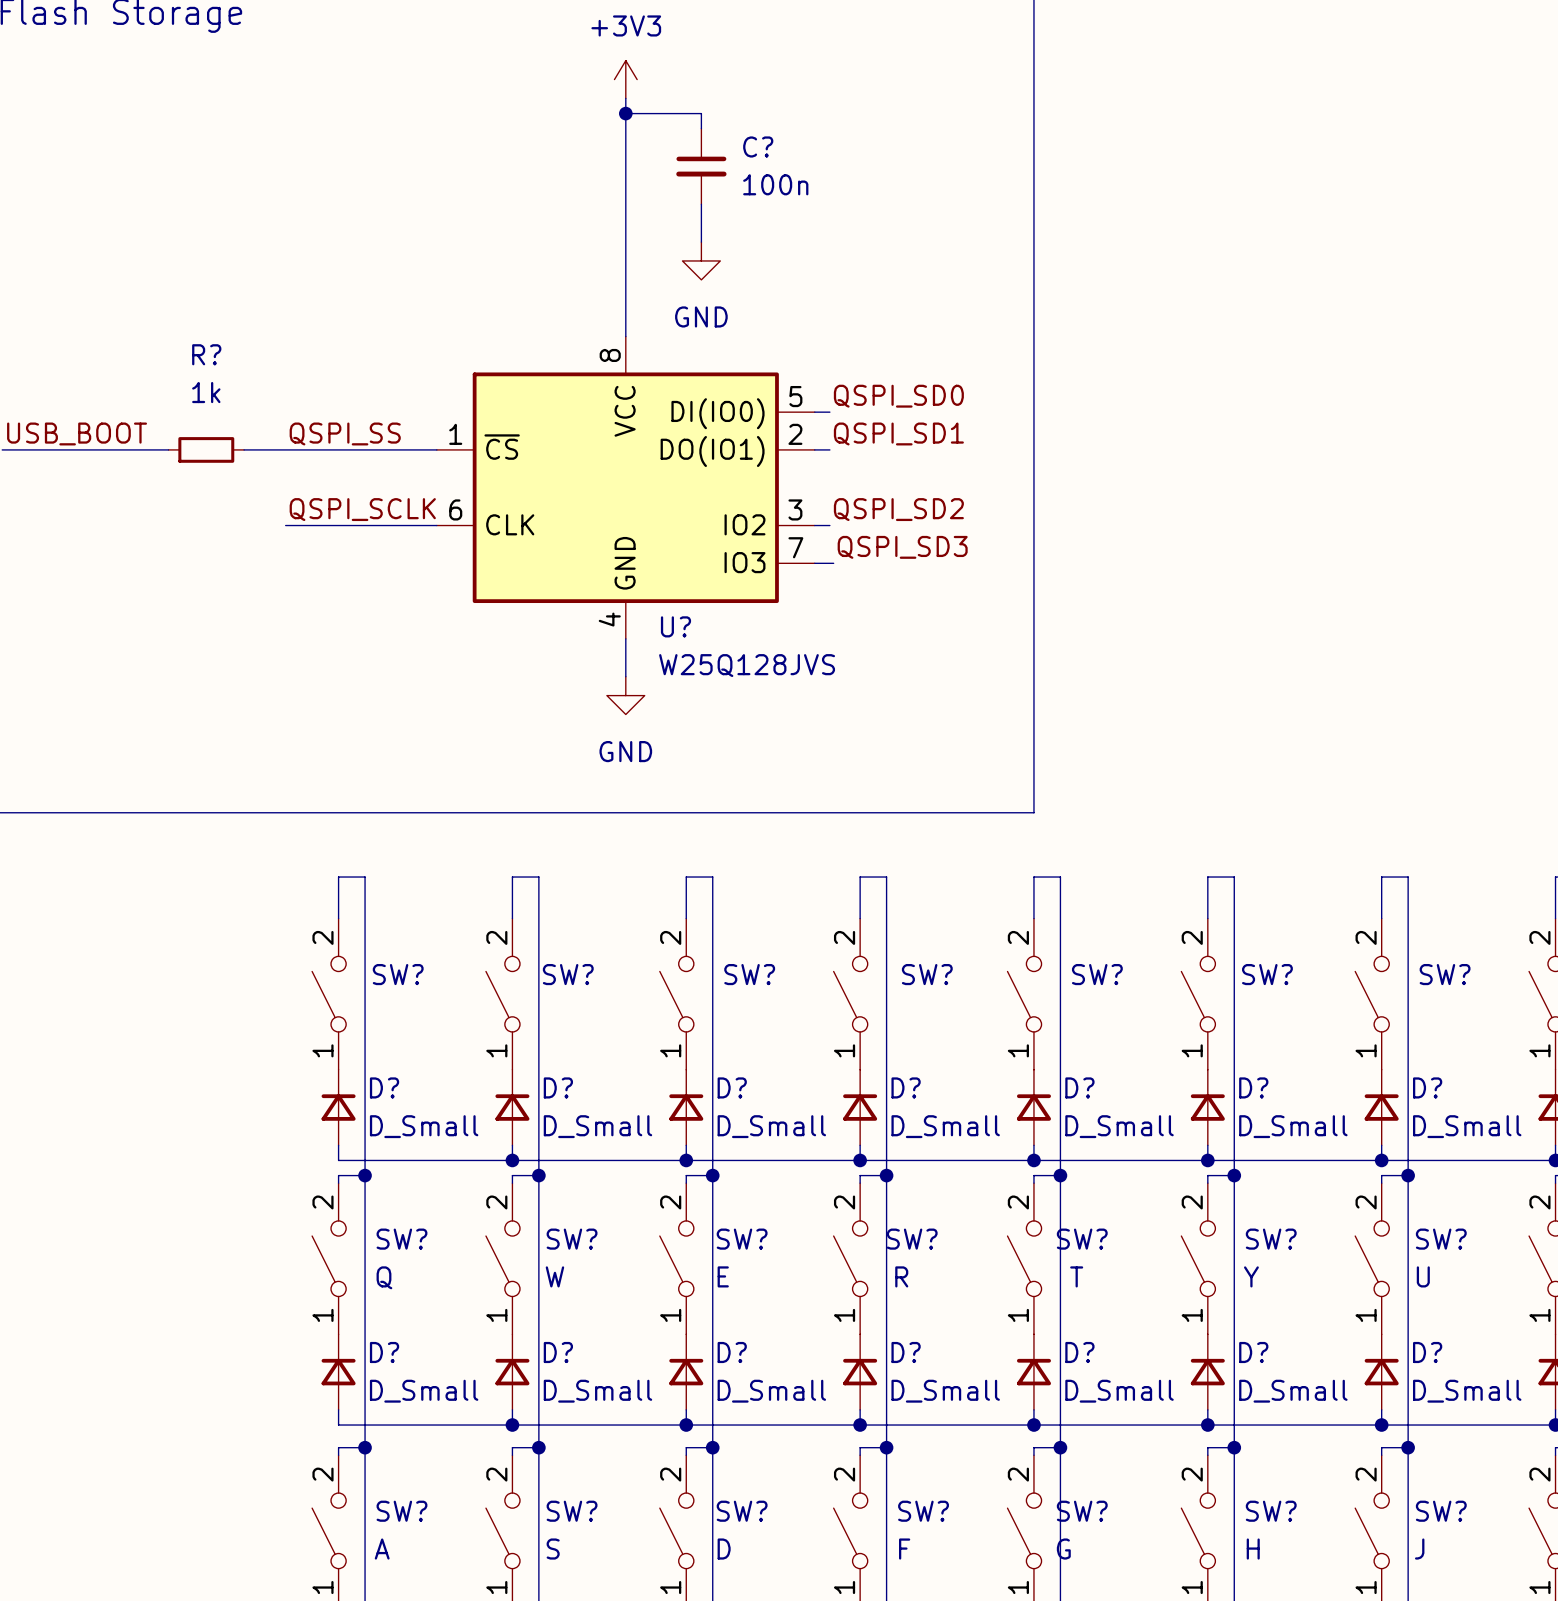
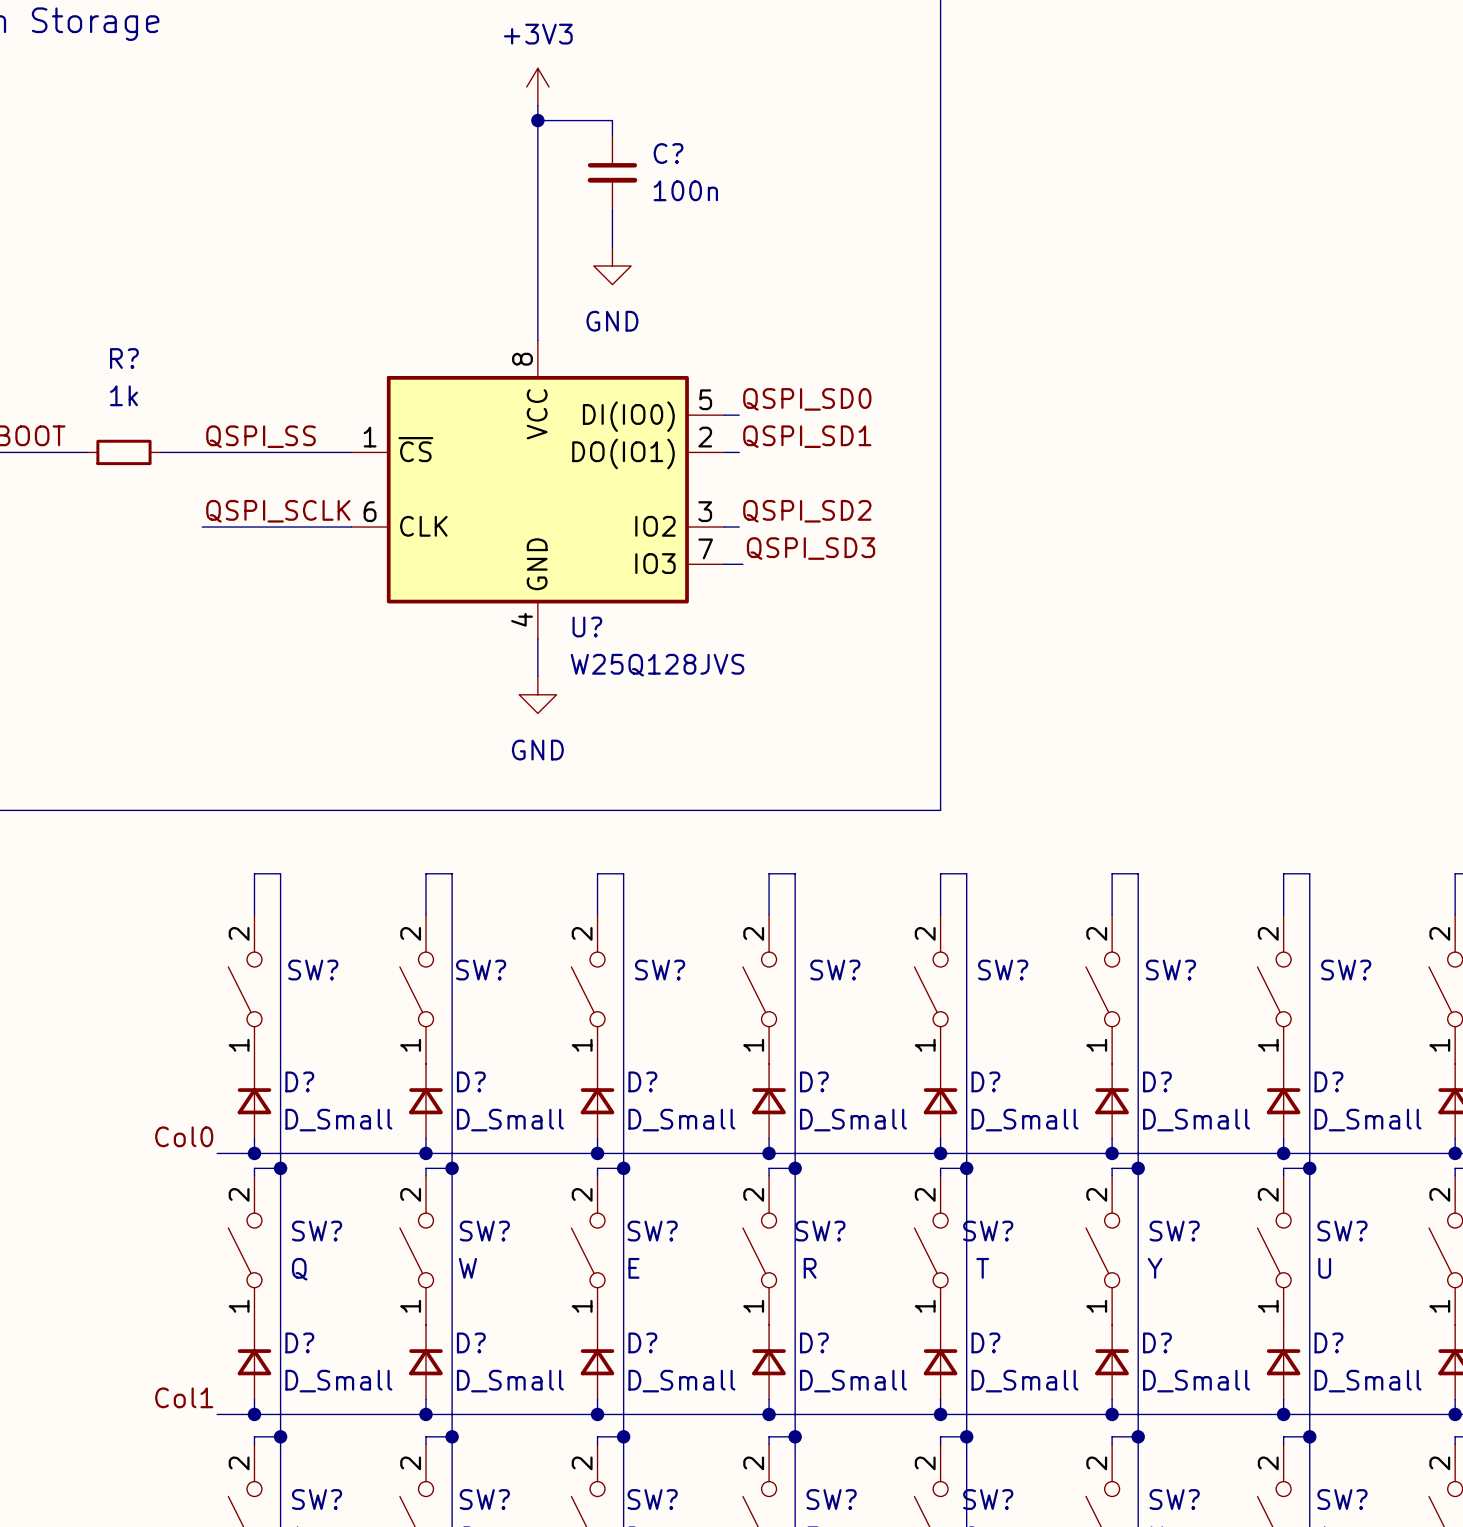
label: none -> Col0 (184, 1136)
wire: none -> (217, 1153) (254, 1153)
junction: none -> (254, 1153)
label: none -> Col1 (184, 1397)
wire: none -> (217, 1414) (254, 1414)
junction: none -> (254, 1414)

